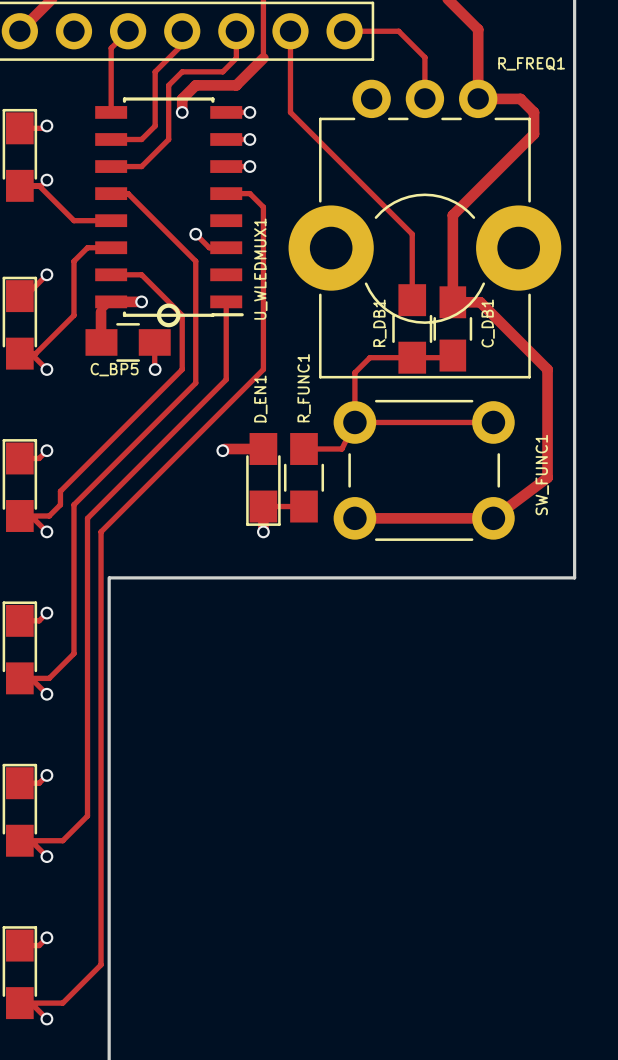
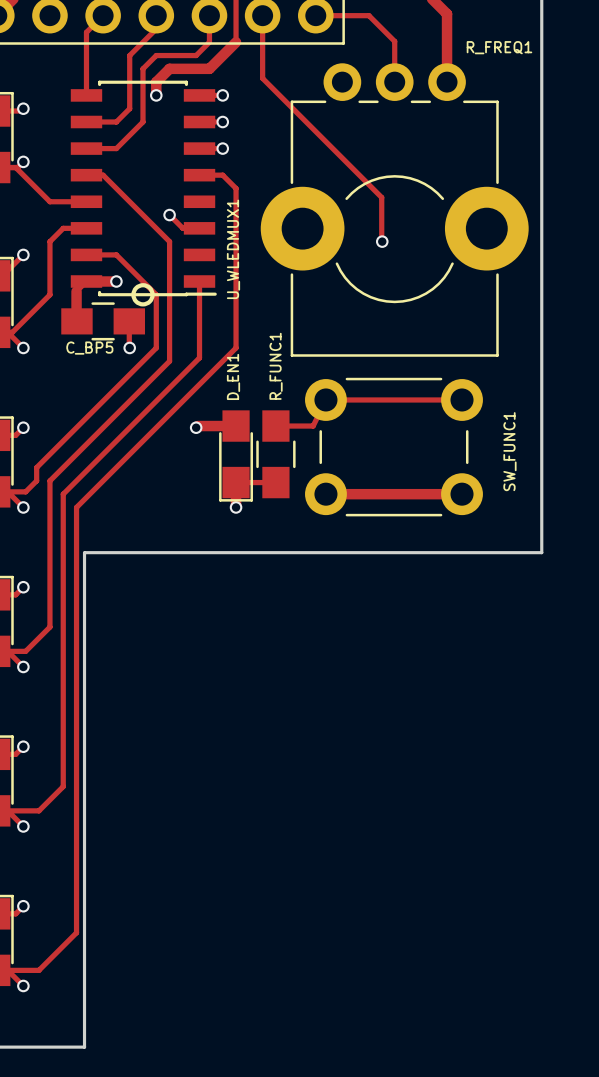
track: (290, 95) (290, 112) (412, 234) (412, 300) -> (262, 78) (381, 197) (382, 241)
track: (478, 98) (520, 98) (534, 112) (534, 134) (452, 215) (452, 302) (480, 302) (547, 369) (547, 477) (493, 518) -> none
via: none -> (382, 241)
R_DB1: (412, 328) -> none
C_DB1: (452, 328) -> none
track: (452, 355) (450, 357) (369, 357) (354, 372) (354, 422) -> none

